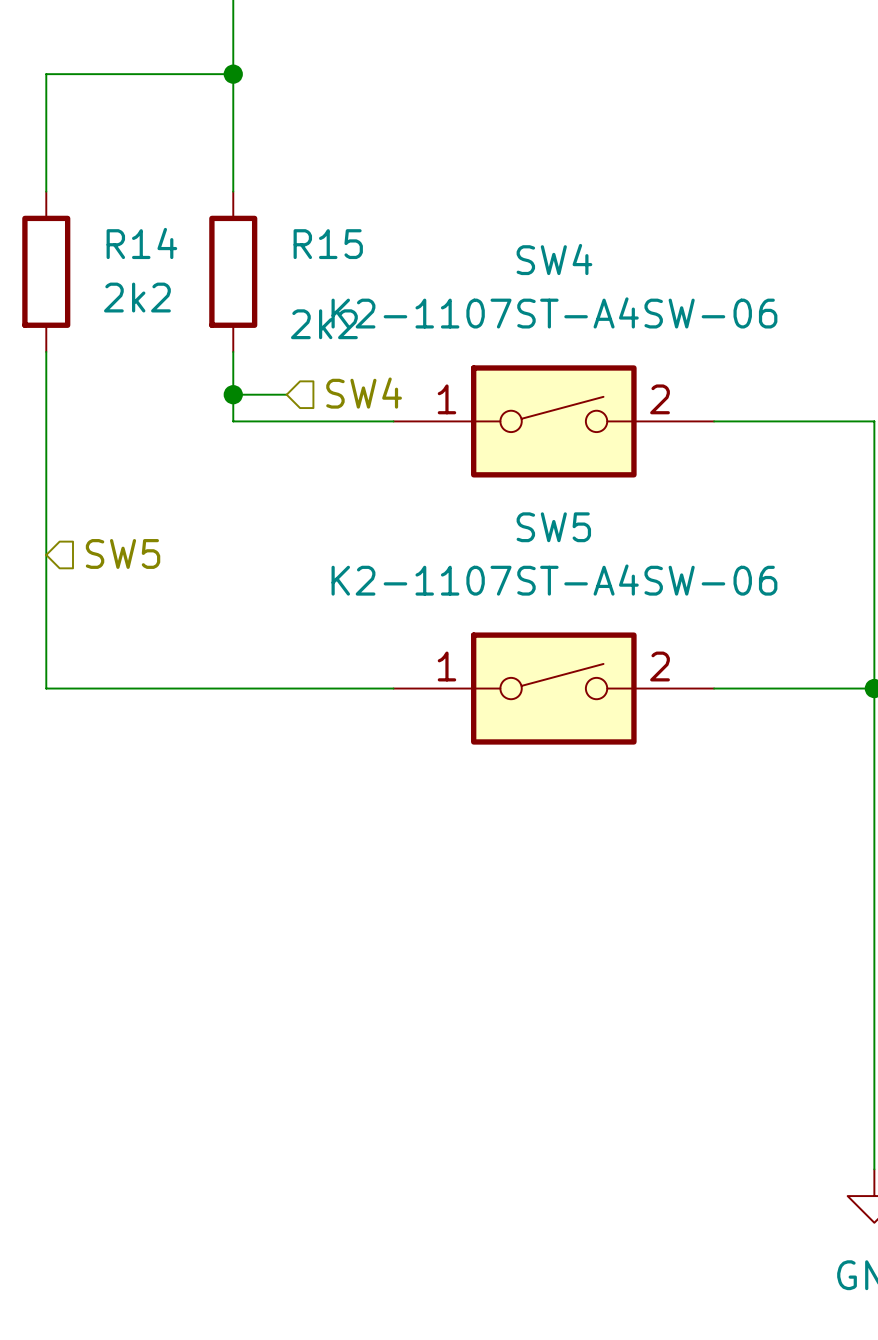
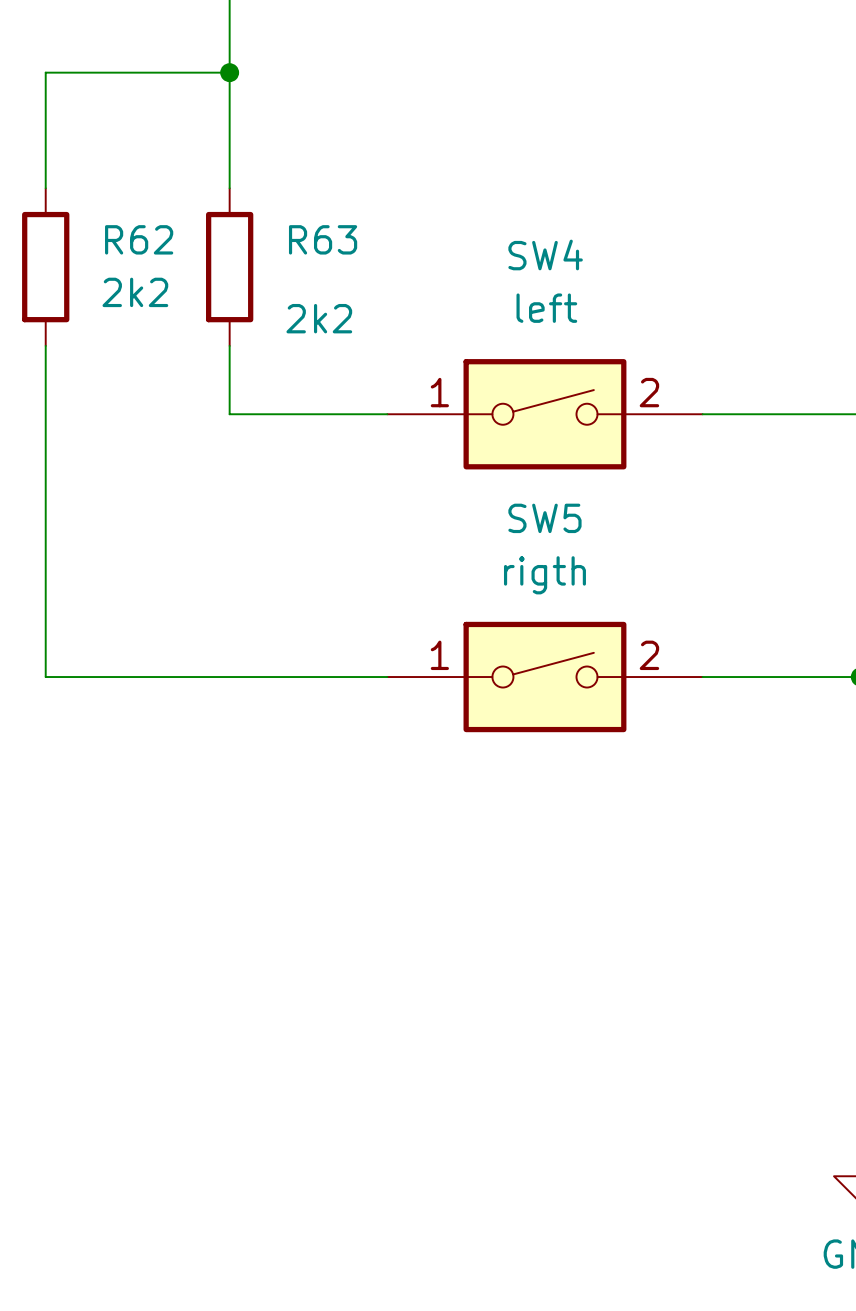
R14 name: R14 (141, 243) -> R62 (139, 239)
R15 name: R15 (328, 244) -> R63 (323, 239)
SW4 value: K2-1107ST-A4SW-06 (554, 312) -> left (546, 308)
hierarchical label: SW4 (364, 393) -> none
wire: (233, 394) (286, 394) -> none
junction: (233, 394) -> none
hierarchical label: SW5 (123, 553) -> none
SW5 value: K2-1107ST-A4SW-06 (554, 580) -> rigth (544, 575)

